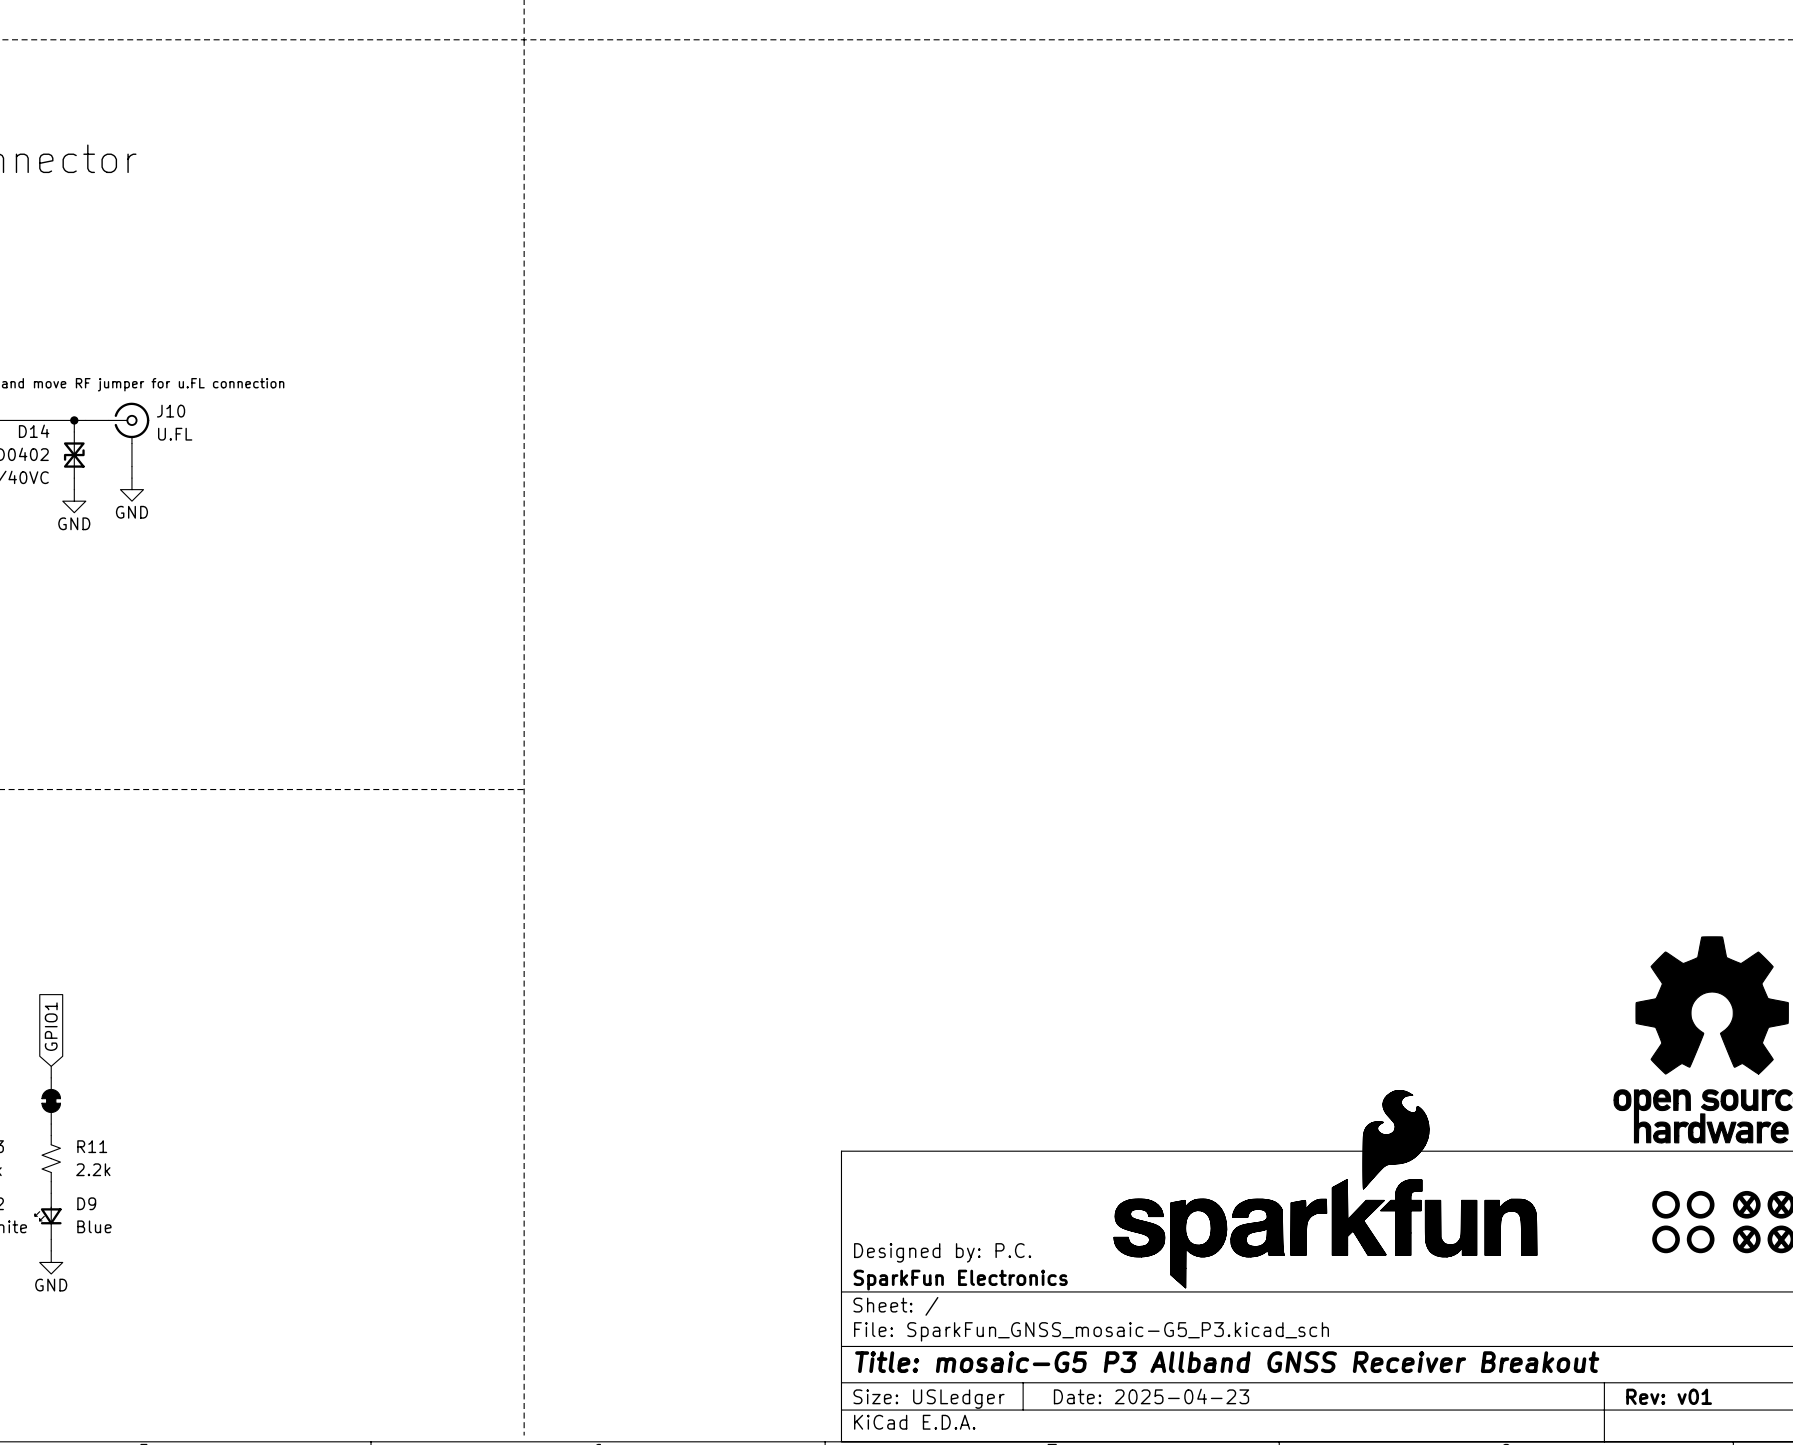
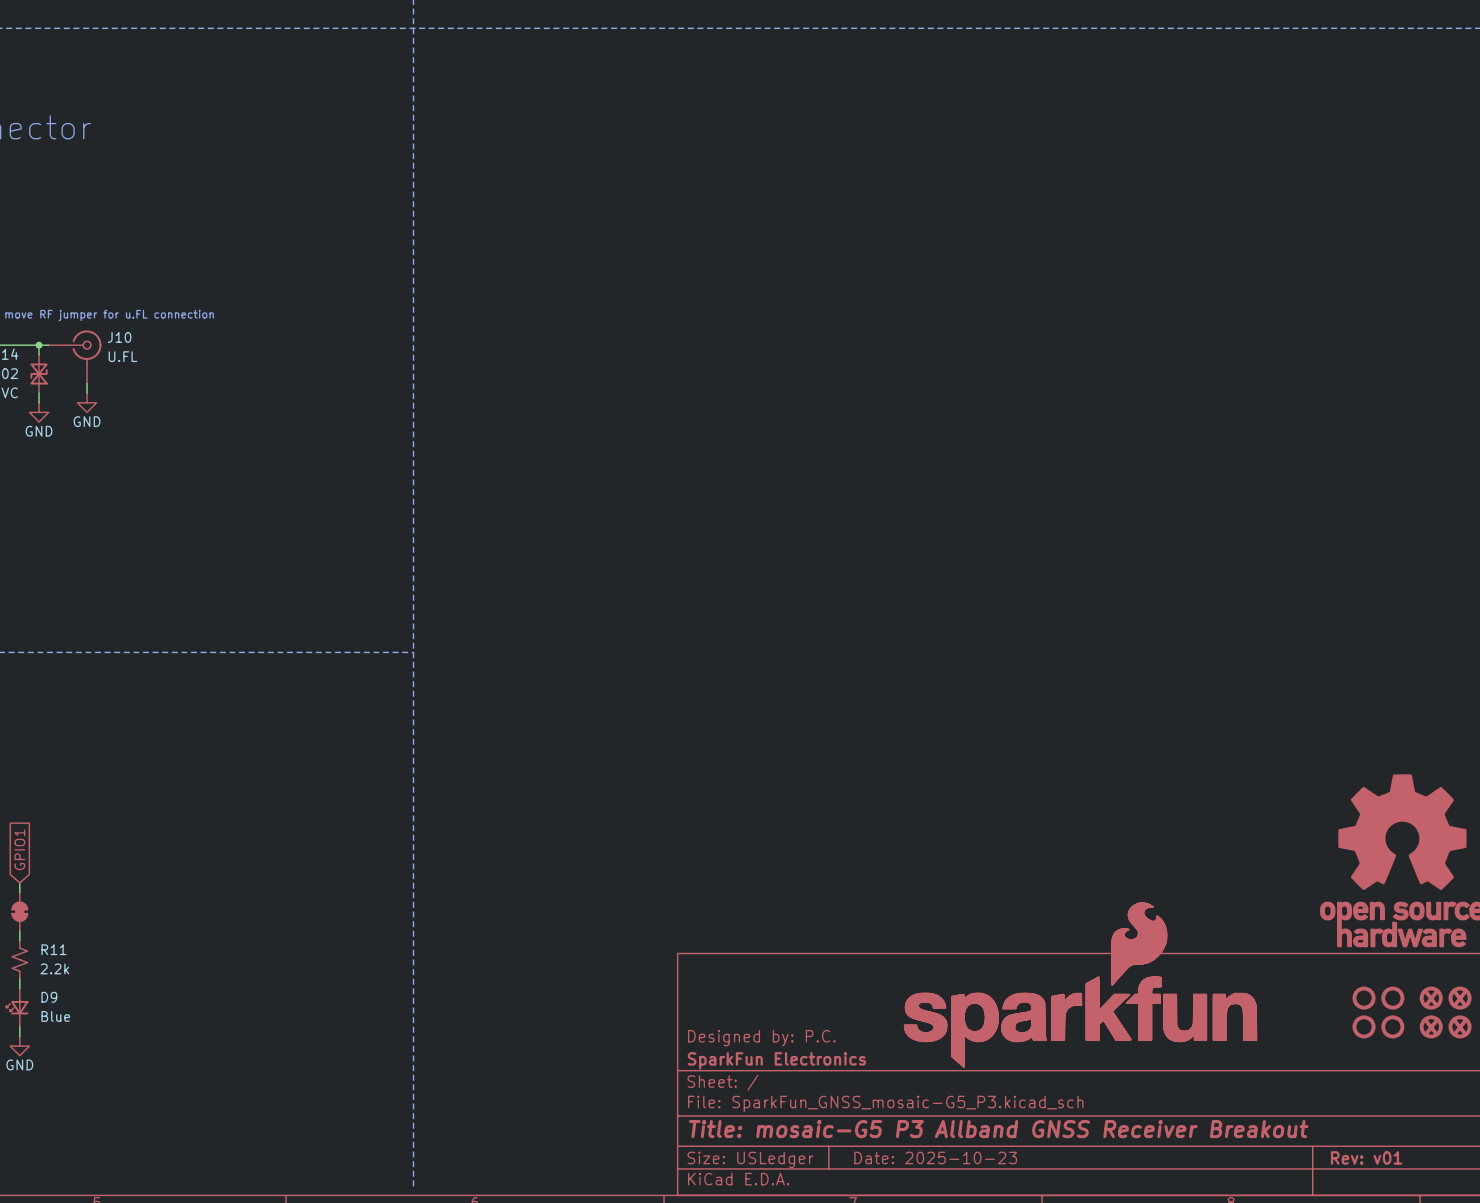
title block: Date: 2025-04-23 (1151, 1396) -> Date: 2025-10-23 (935, 1157)

